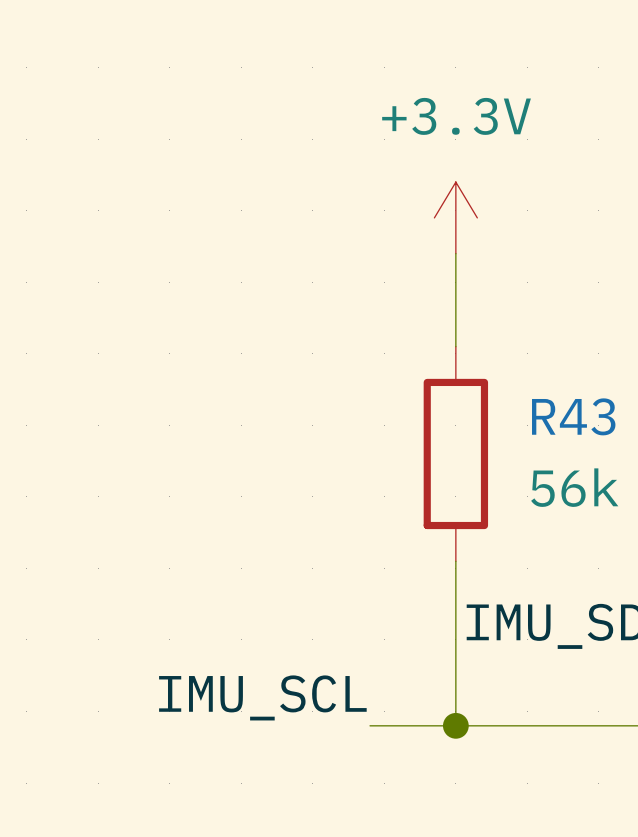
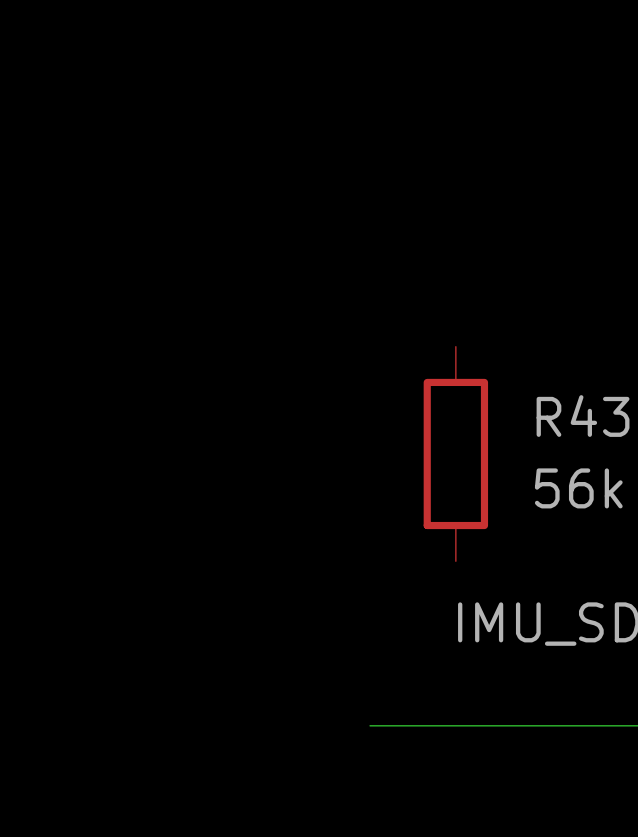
power symbol: +3.3V (455, 217) -> none
wire: (455, 253) (455, 346) -> none
wire: (455, 561) (455, 725) -> none
label: IMU_SCL (262, 697) -> none
junction: (455, 725) -> none

